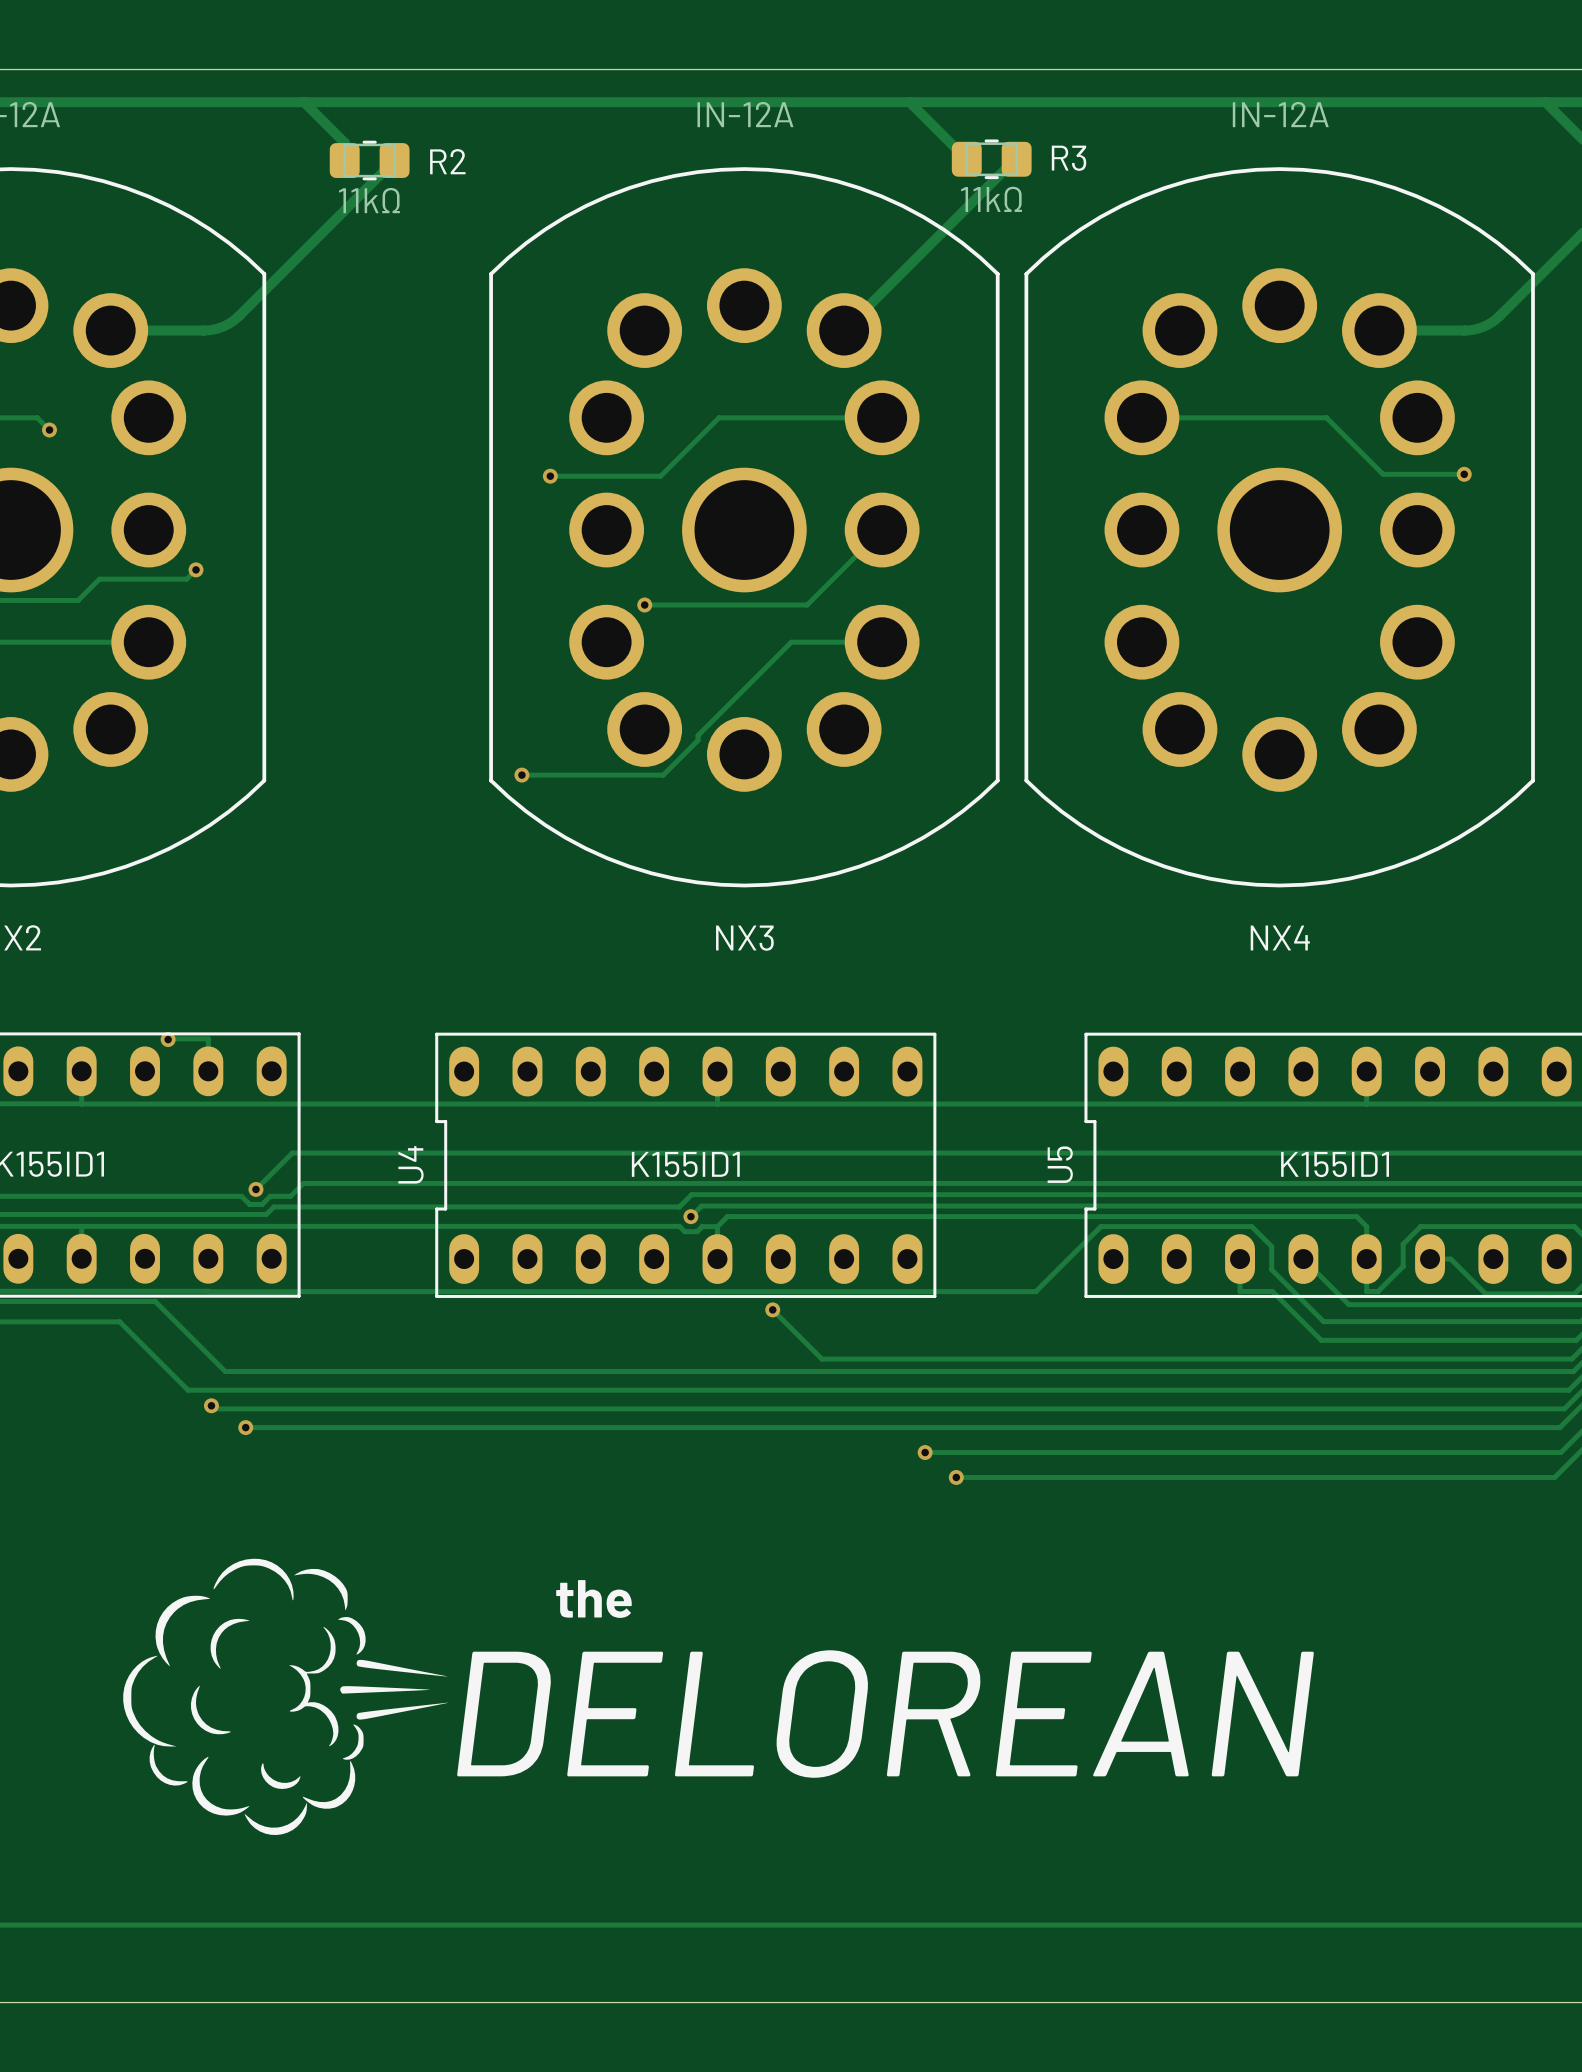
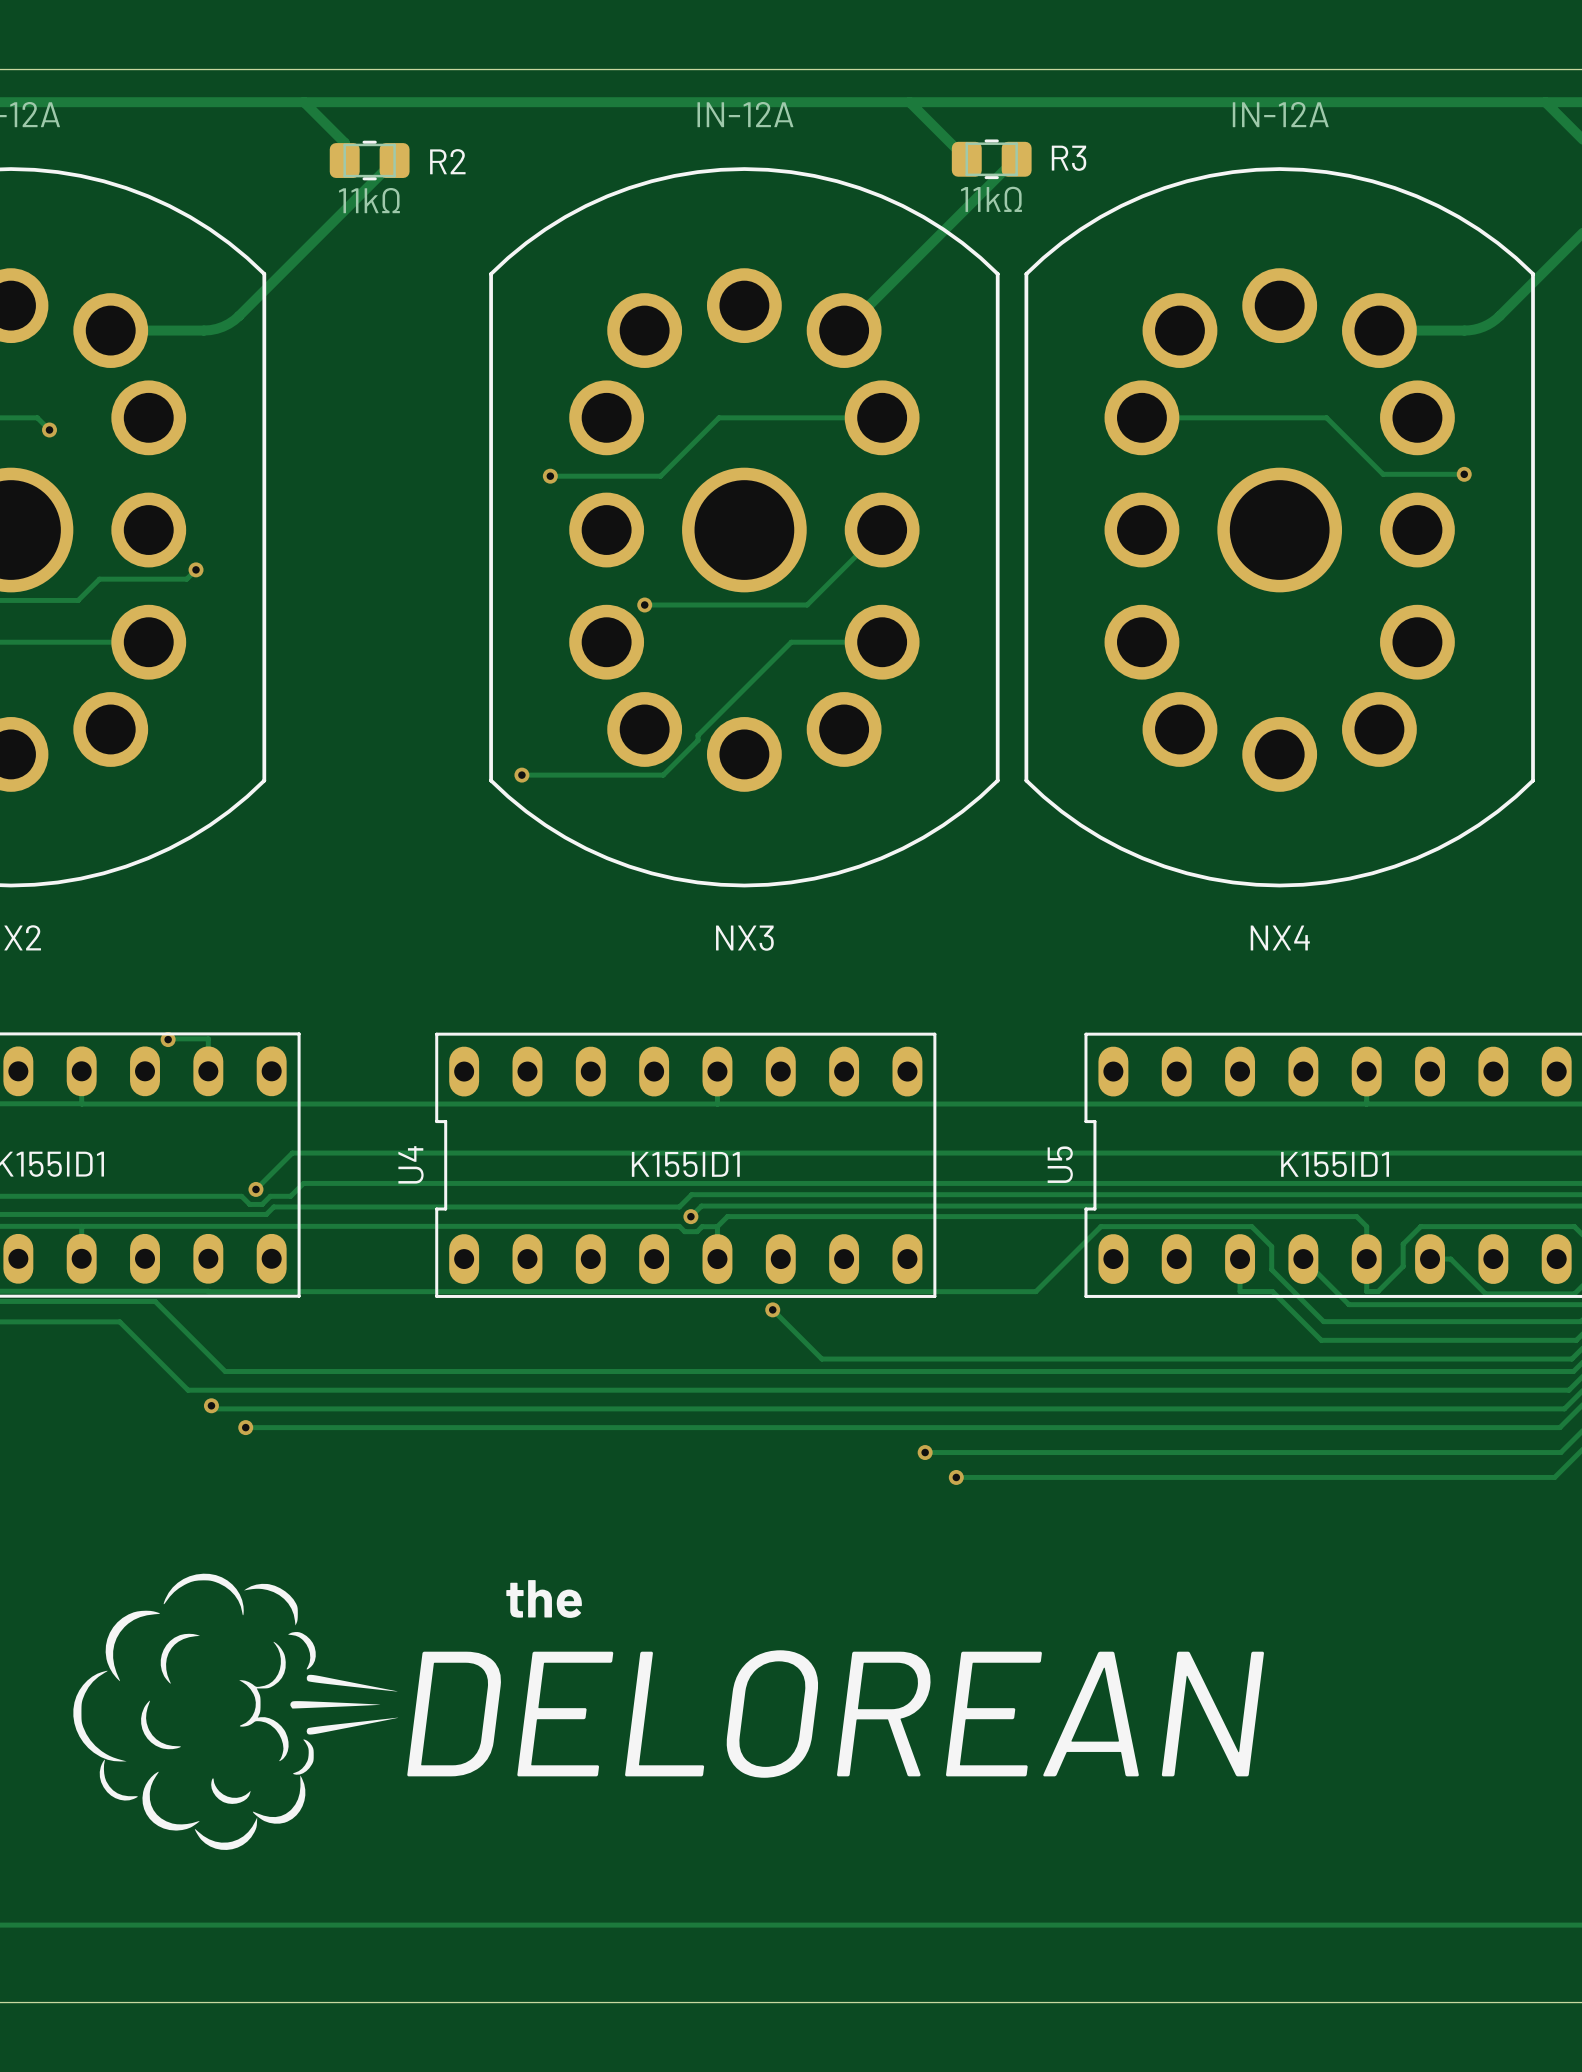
text position: the (594, 1599) -> the (544, 1599)
drawing position: (285, 1696) -> (235, 1711)
text position: DELOREAN (885, 1714) -> DELOREAN (835, 1714)

